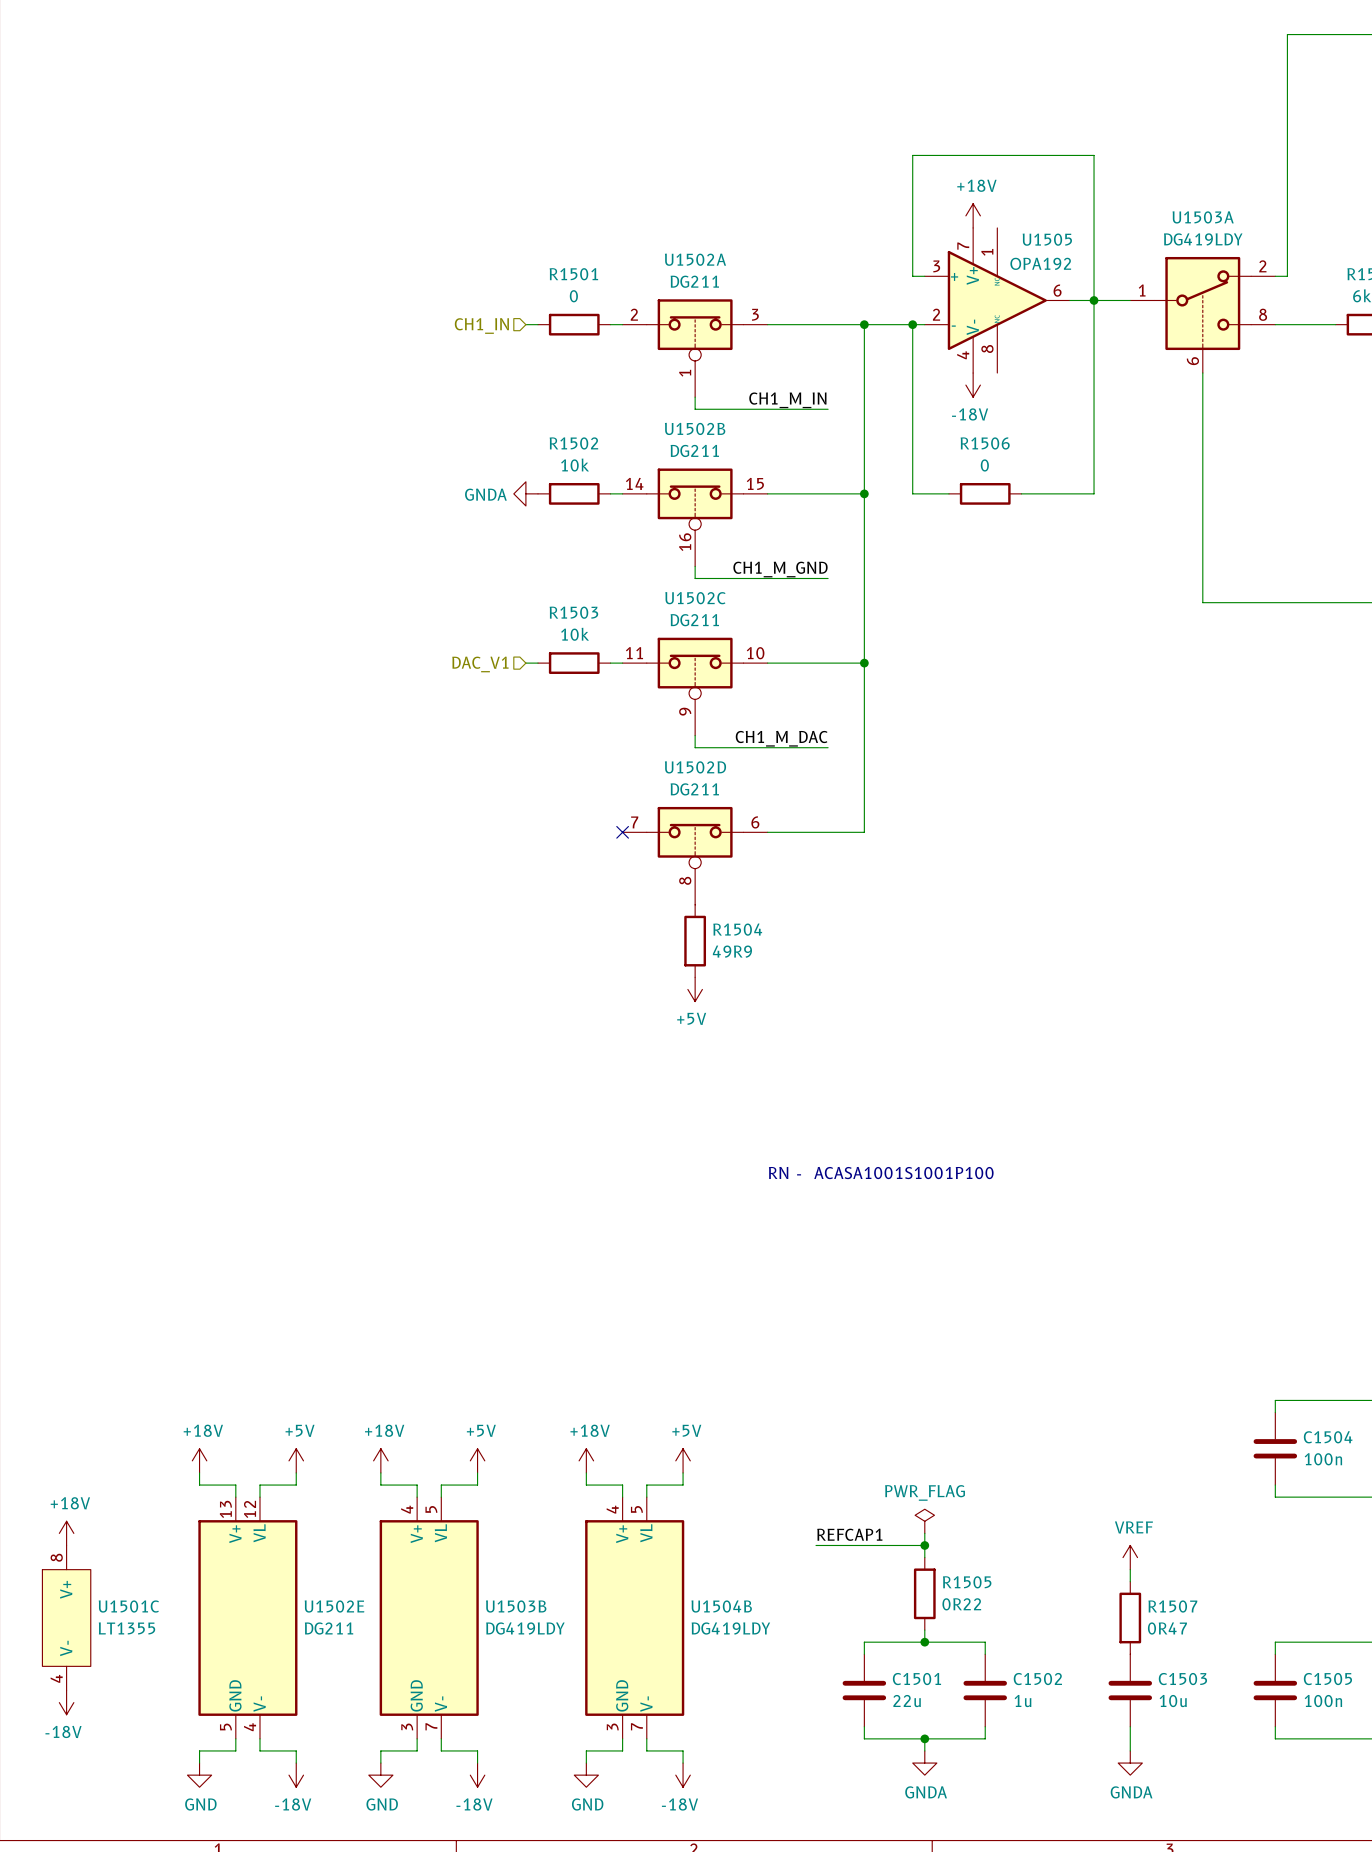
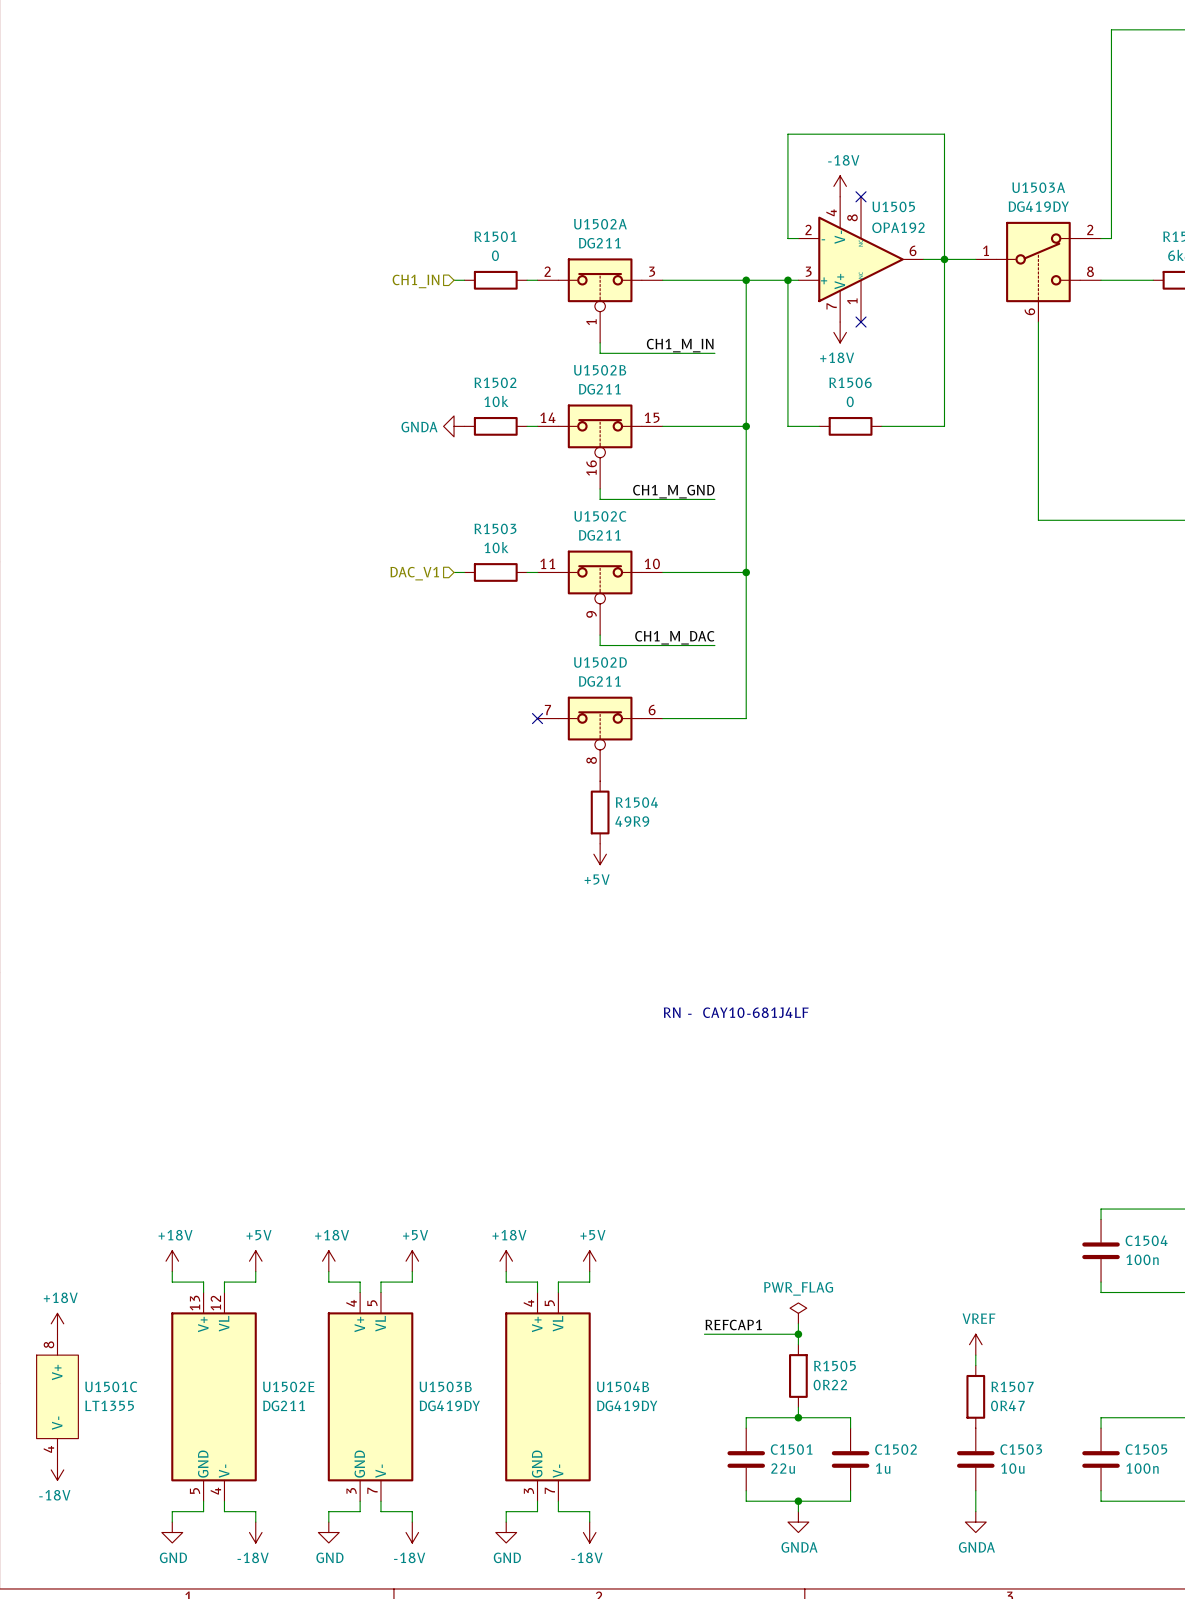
power symbol: +18V (973, 215) -> -18V (840, 186)
no-connect mark: none -> (861, 196)
U1503A value: DG419LDY (1203, 239) -> DG419DY (1038, 206)
U1505 flip: as is (997, 300) -> up-down (861, 259)
no-connect mark: none -> (861, 322)
power symbol: -18V (973, 385) -> +18V (840, 332)
text: RN - ACASA1001S1001P100 (881, 1173) -> RN - CAY10-681J4LF (736, 1012)
U1503B value: DG419LDY (525, 1628) -> DG419DY (449, 1405)
U1504B value: DG419LDY (730, 1628) -> DG419DY (627, 1405)

